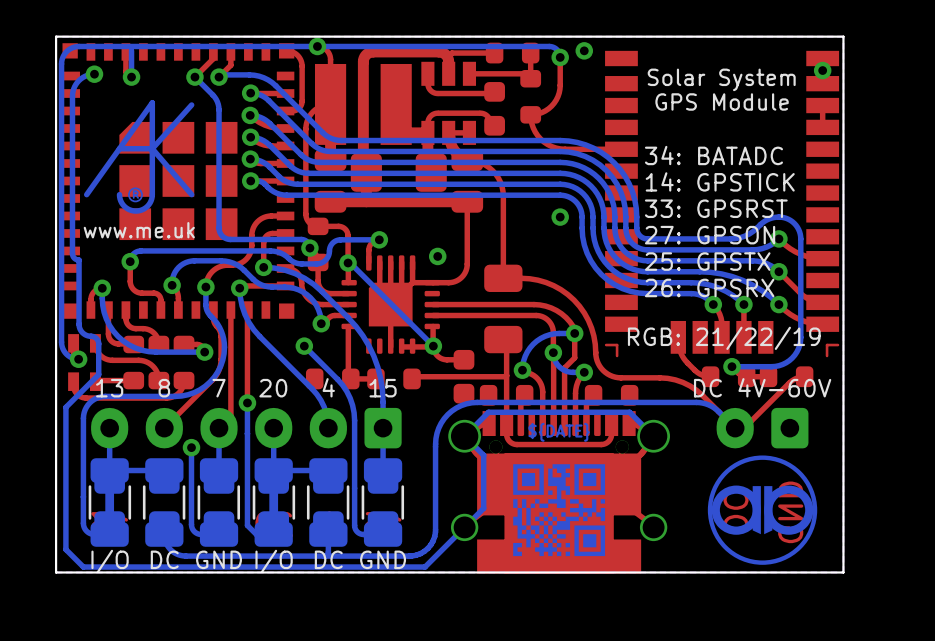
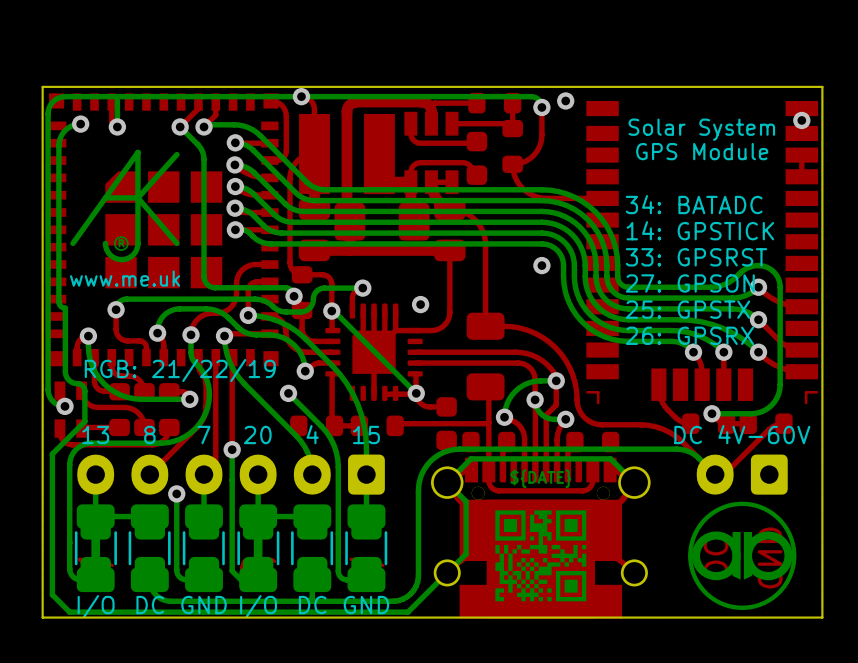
text position: RGB: 21/22/19 (724, 338) -> RGB: 21/22/19 (180, 370)

